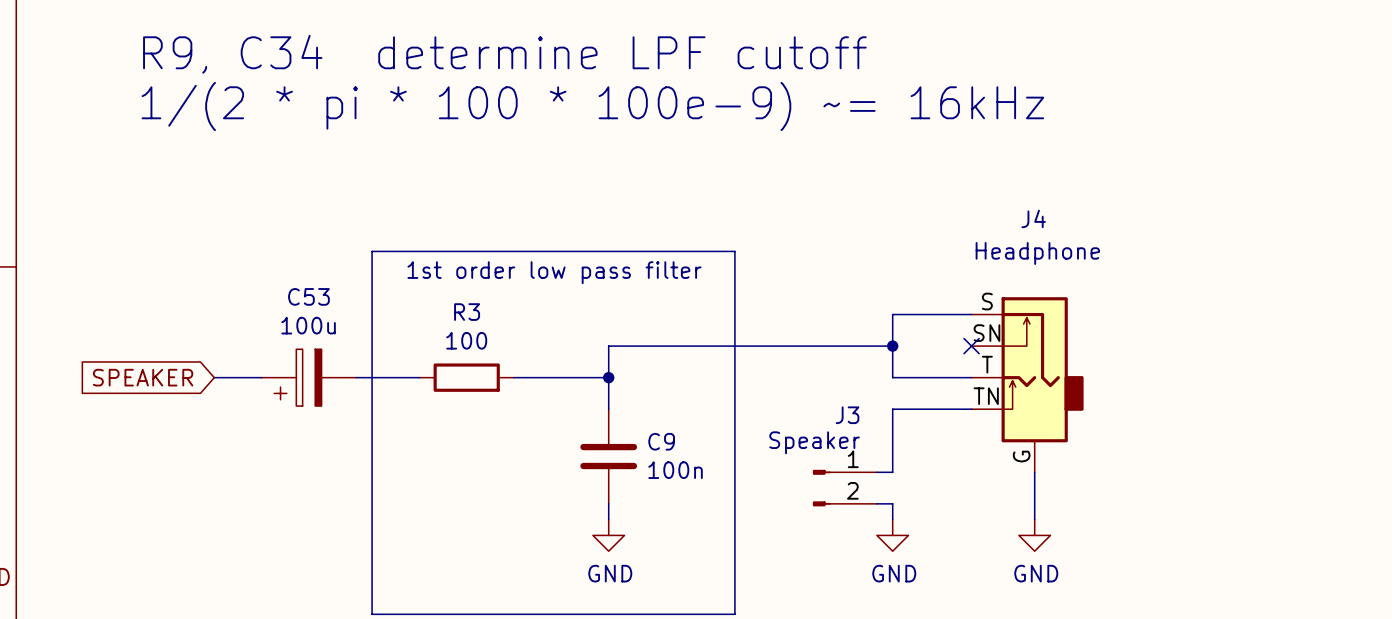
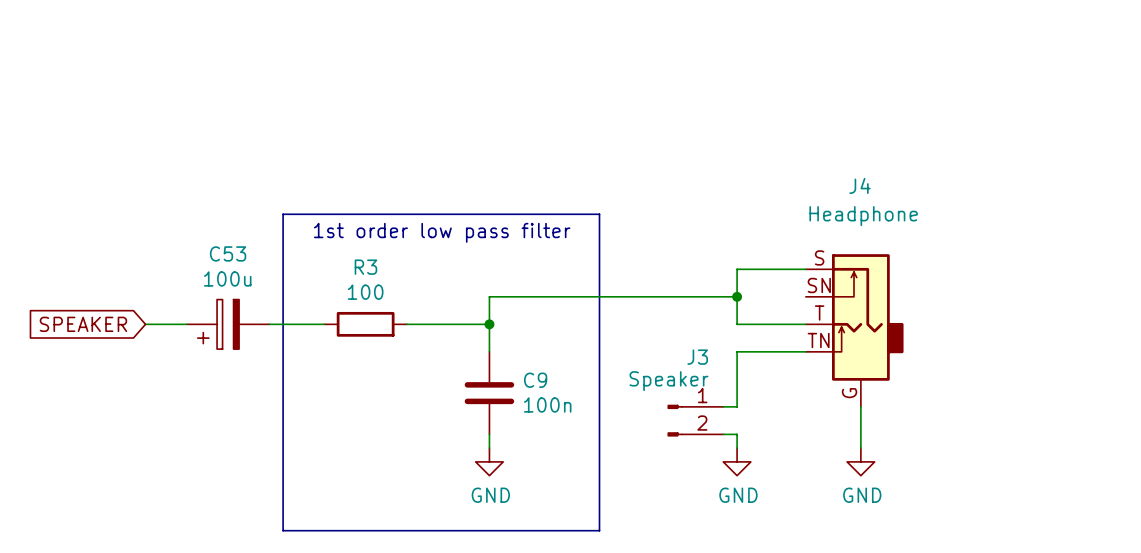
text: R9, C34 determine LPF cutoff (504, 54) -> none
text: 1/(2 * pi * 100 * 100e-9) ~= 16kHz (592, 106) -> none
no-connect mark: (971, 346) -> none

